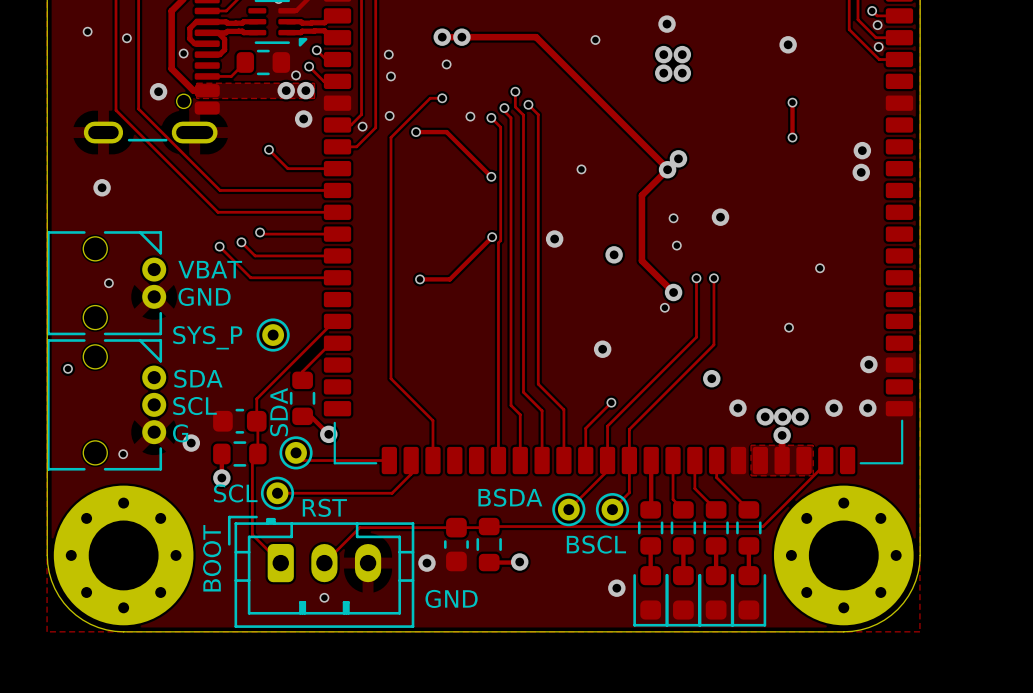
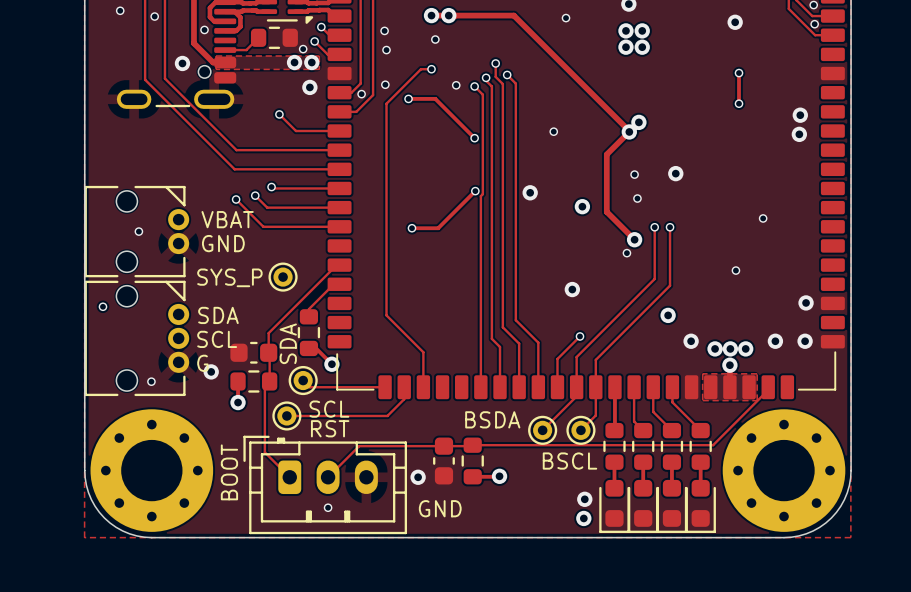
via: (102, 187) -> none
text position: SCL (235, 493) -> SCL (329, 409)
via: none -> (583, 518)

